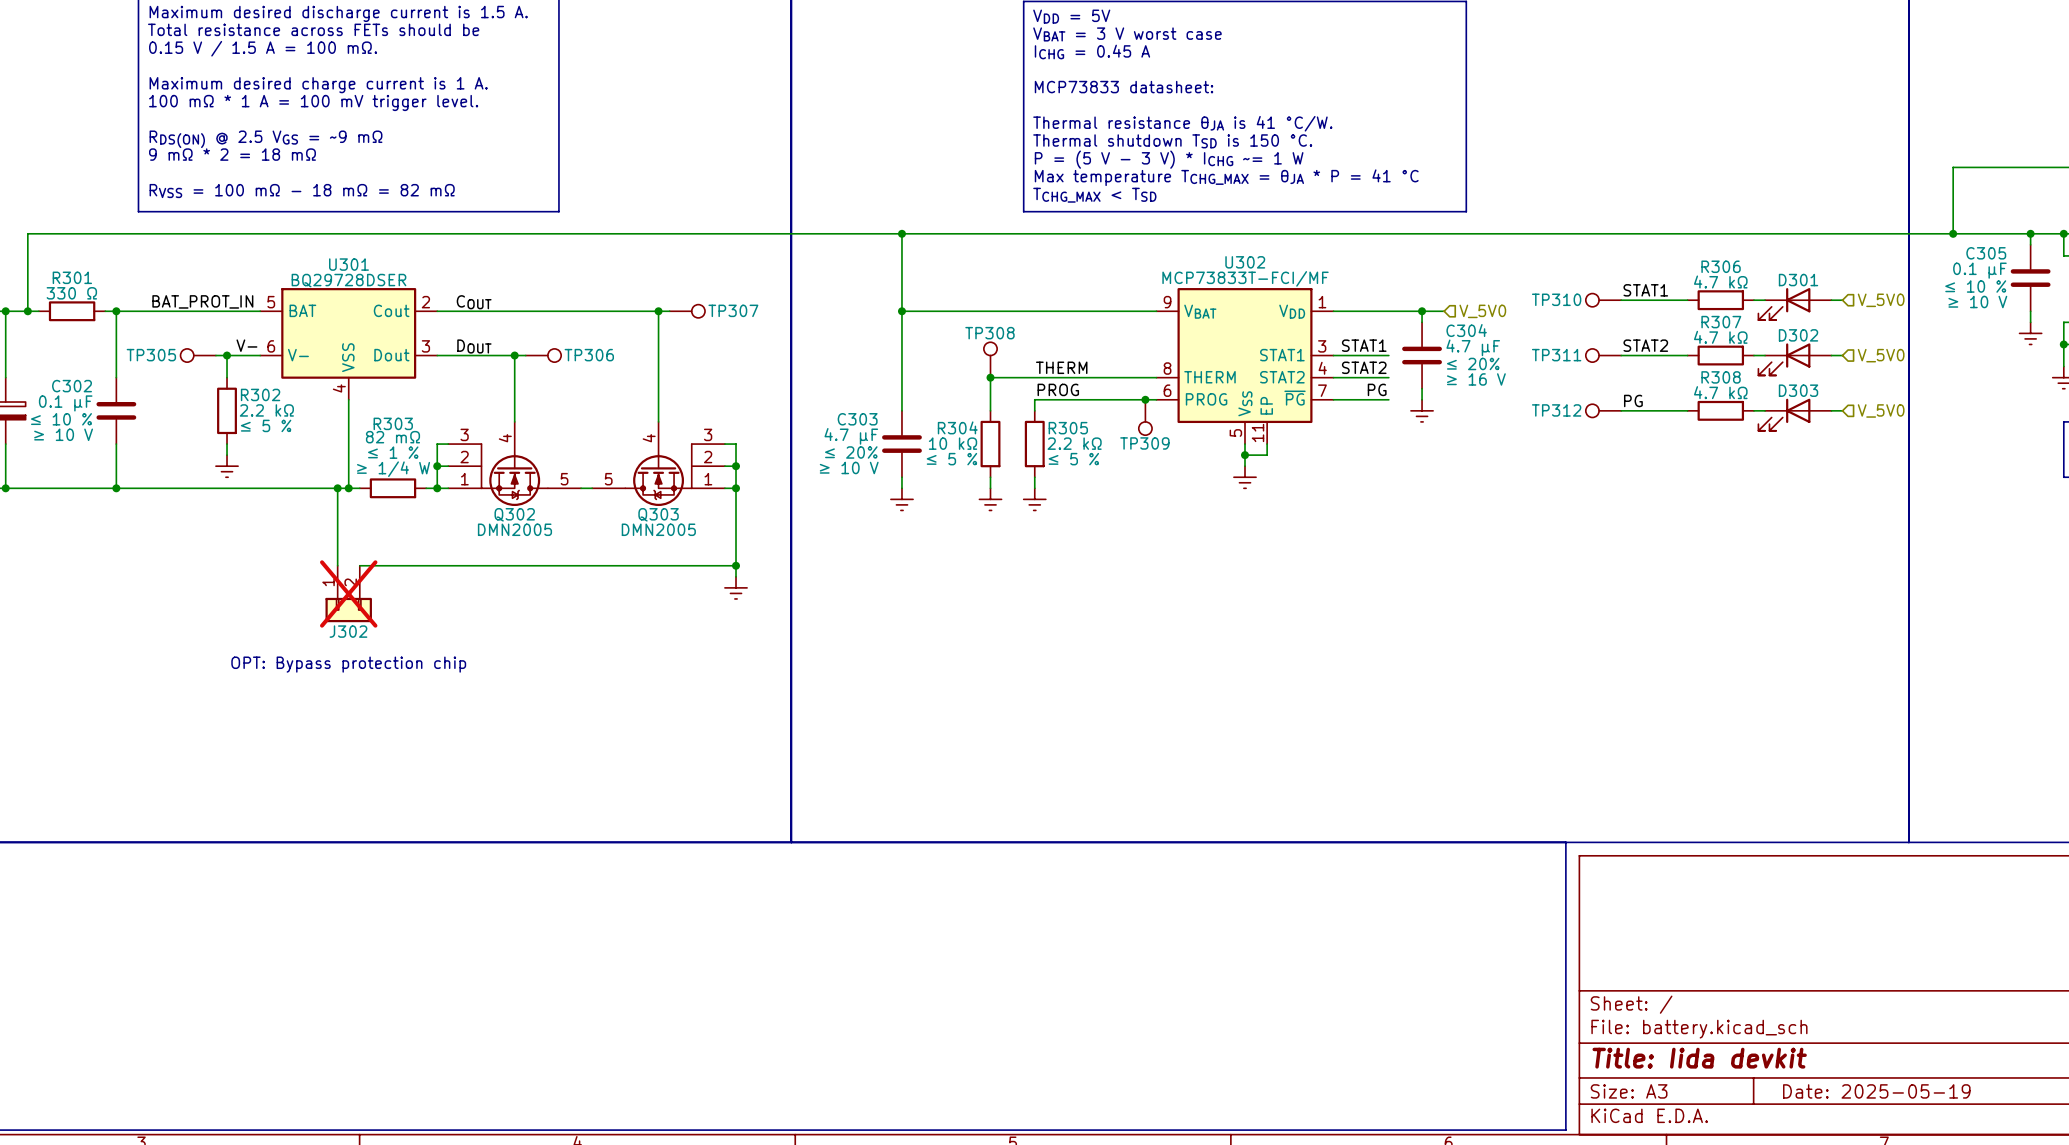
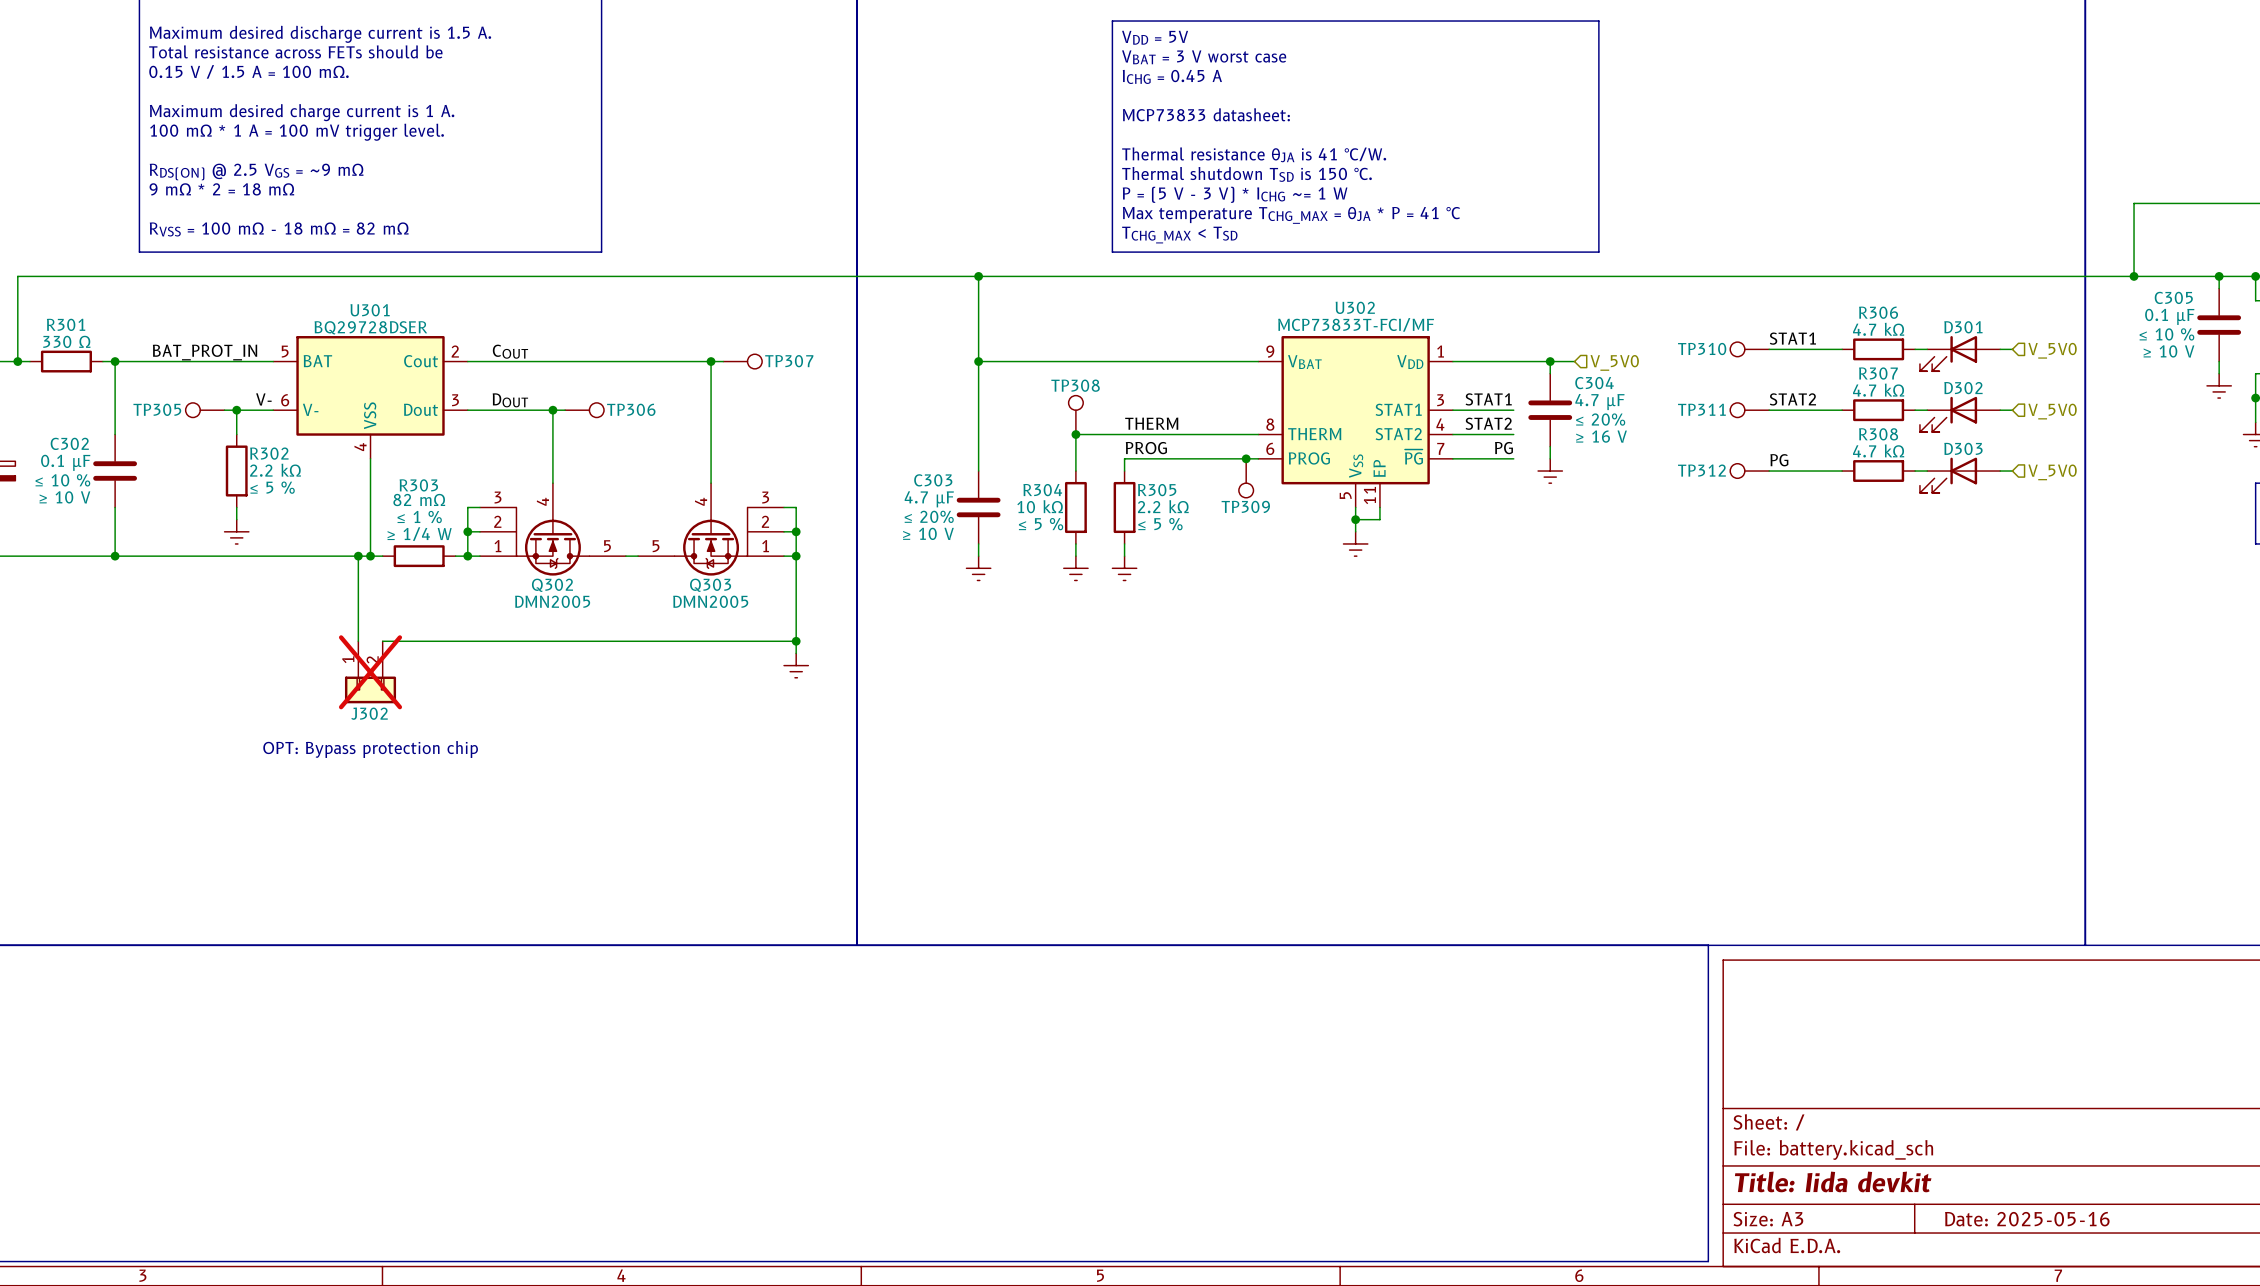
title block: Date: 2025-05-19 (1876, 1091) -> Date: 2025-05-16 (2027, 1219)

